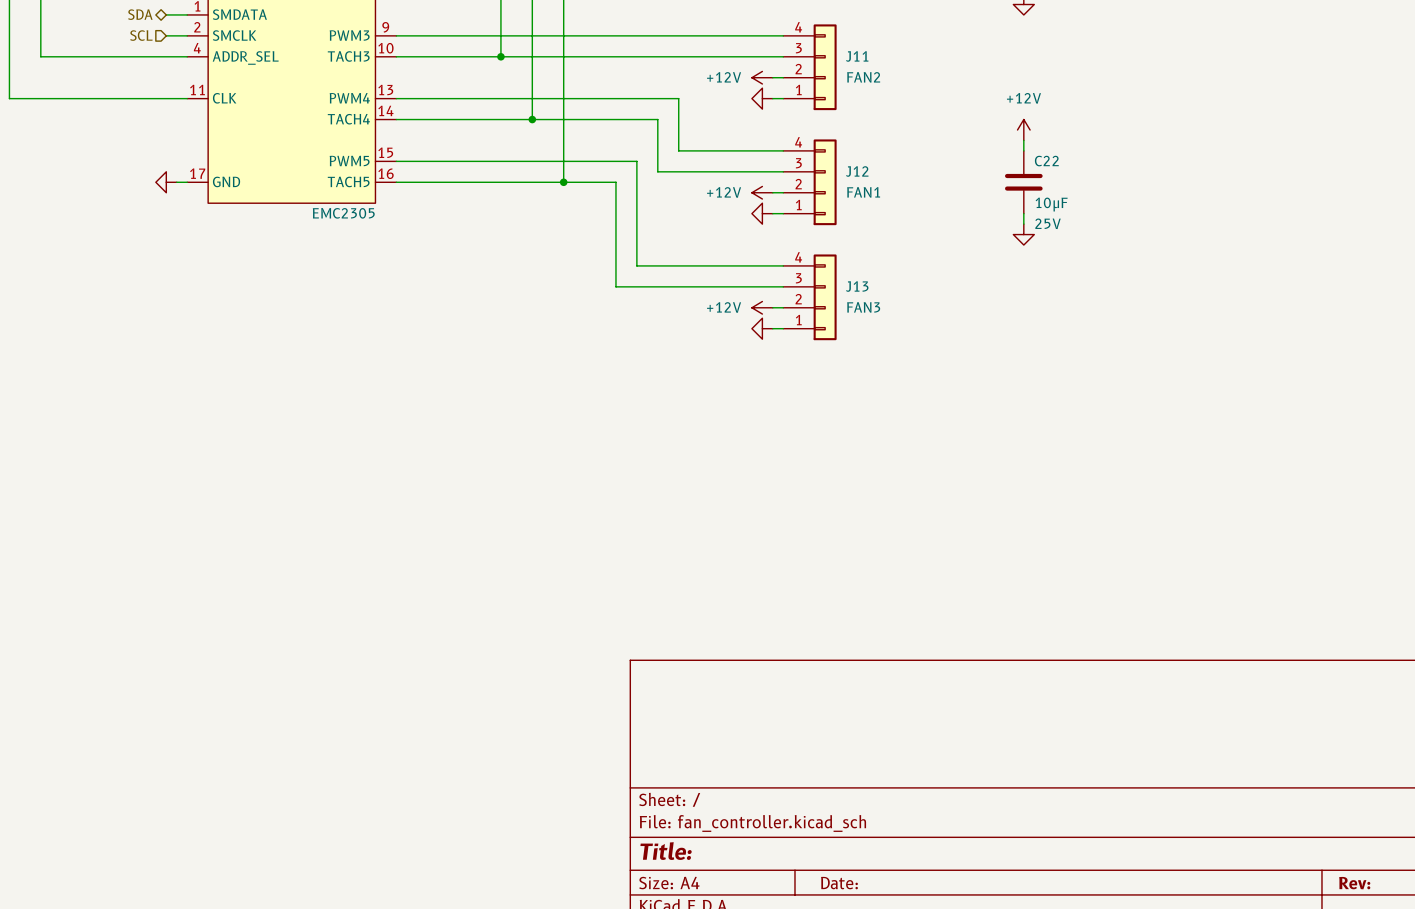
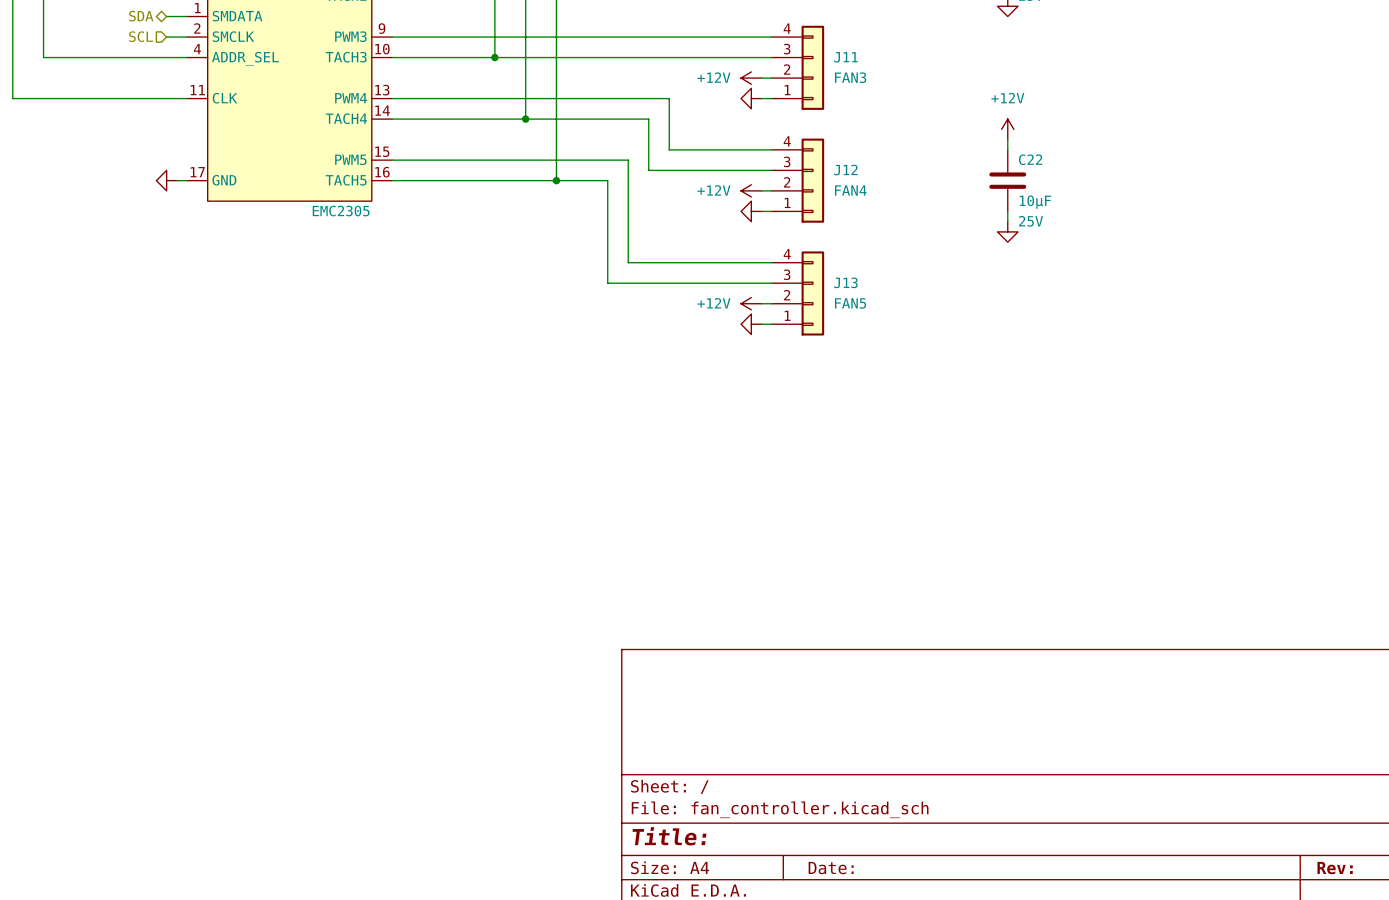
J11 text: FAN2 (863, 77) -> FAN3 (850, 77)
J12 text: FAN1 (863, 192) -> FAN4 (850, 190)
J13 text: FAN3 (863, 307) -> FAN5 (850, 303)

